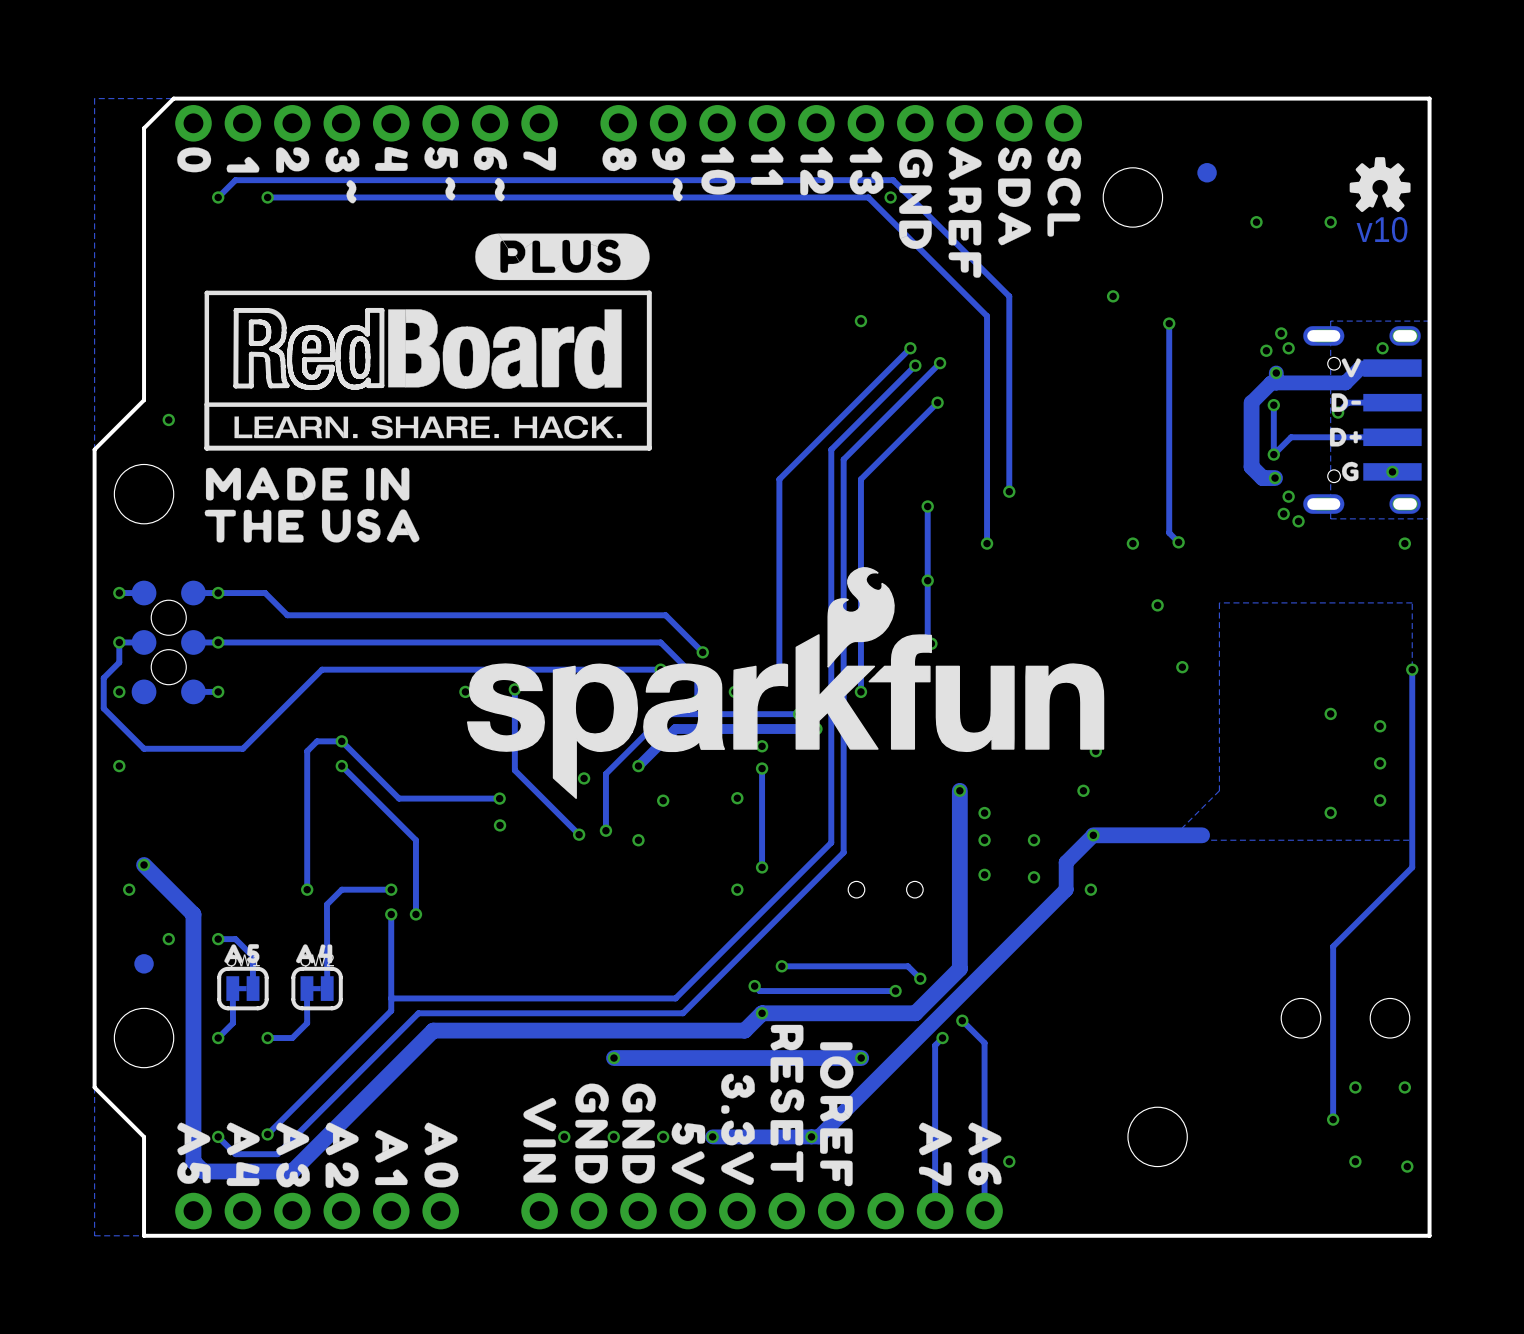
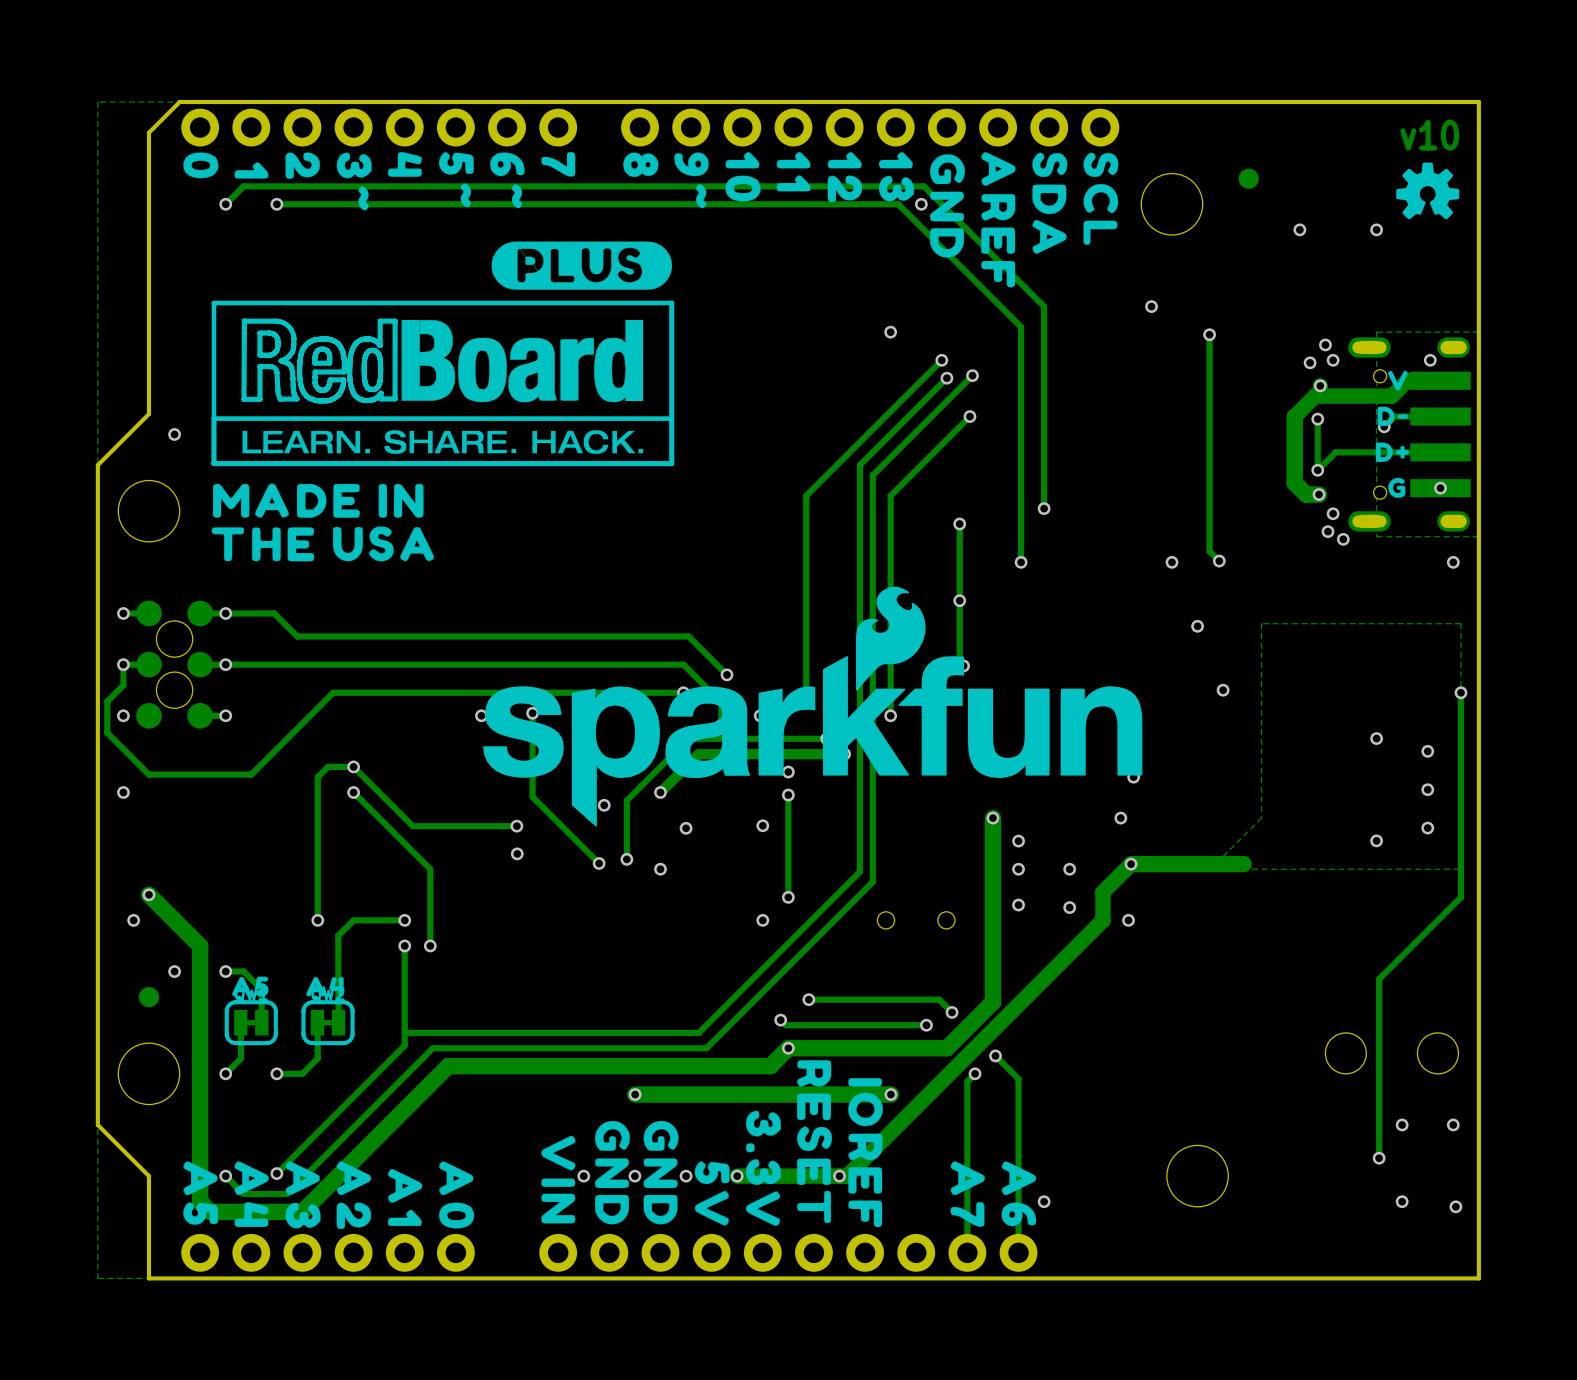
text position: v10 (1382, 229) -> v10 (1429, 135)

